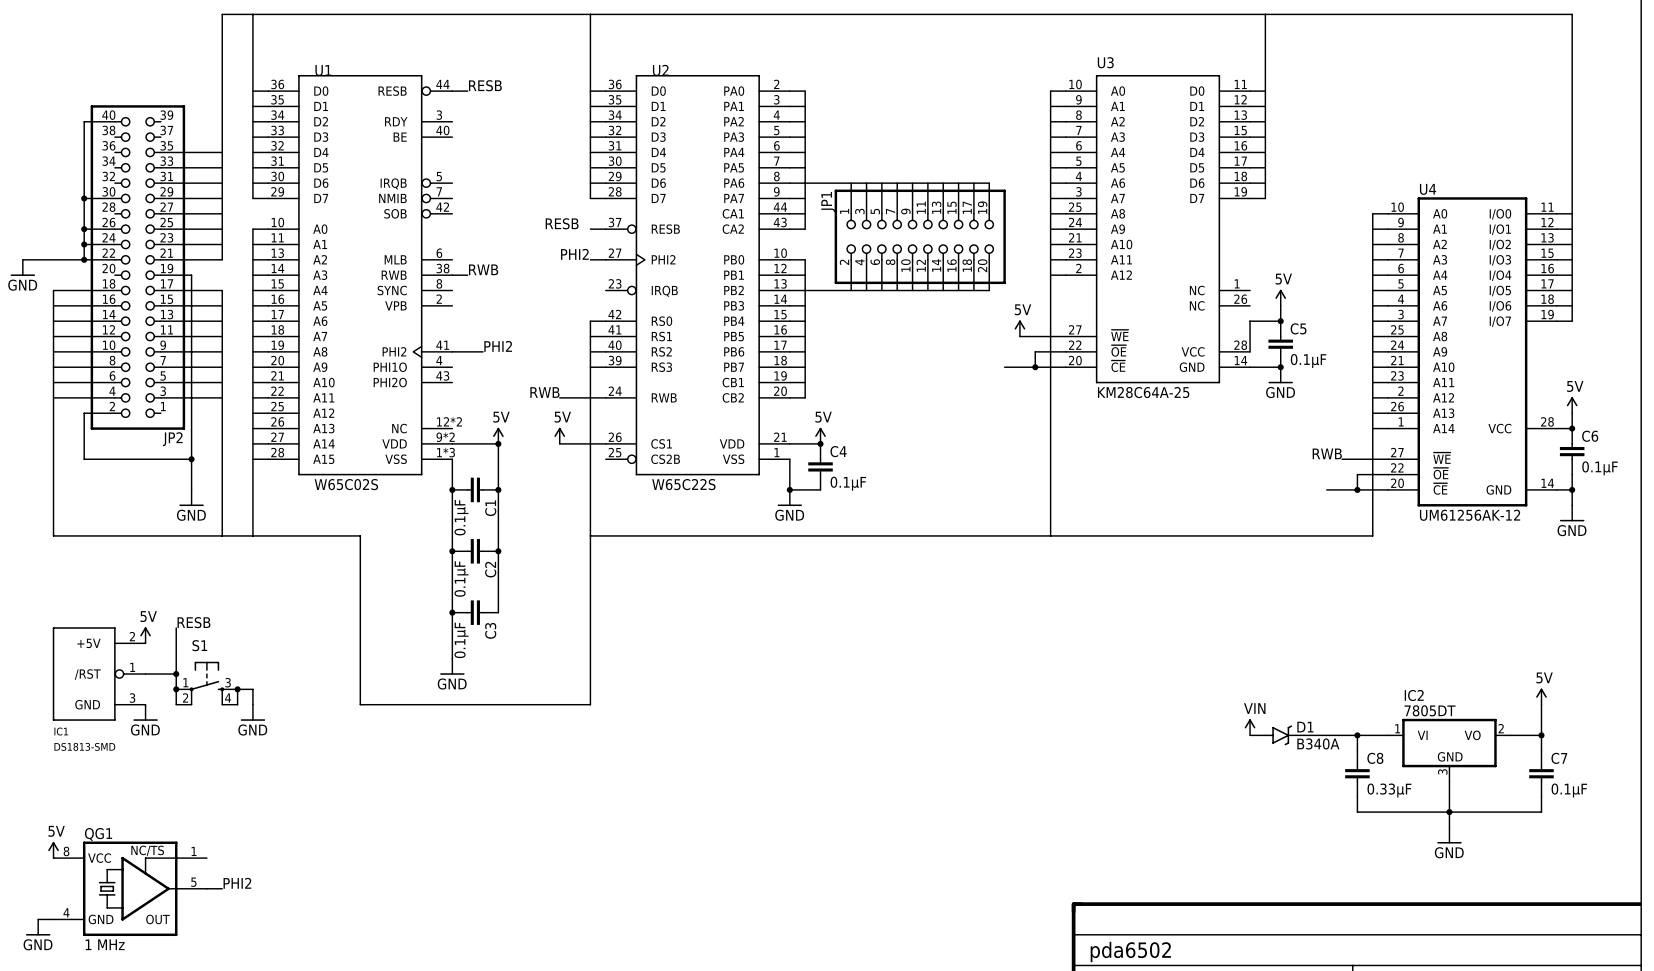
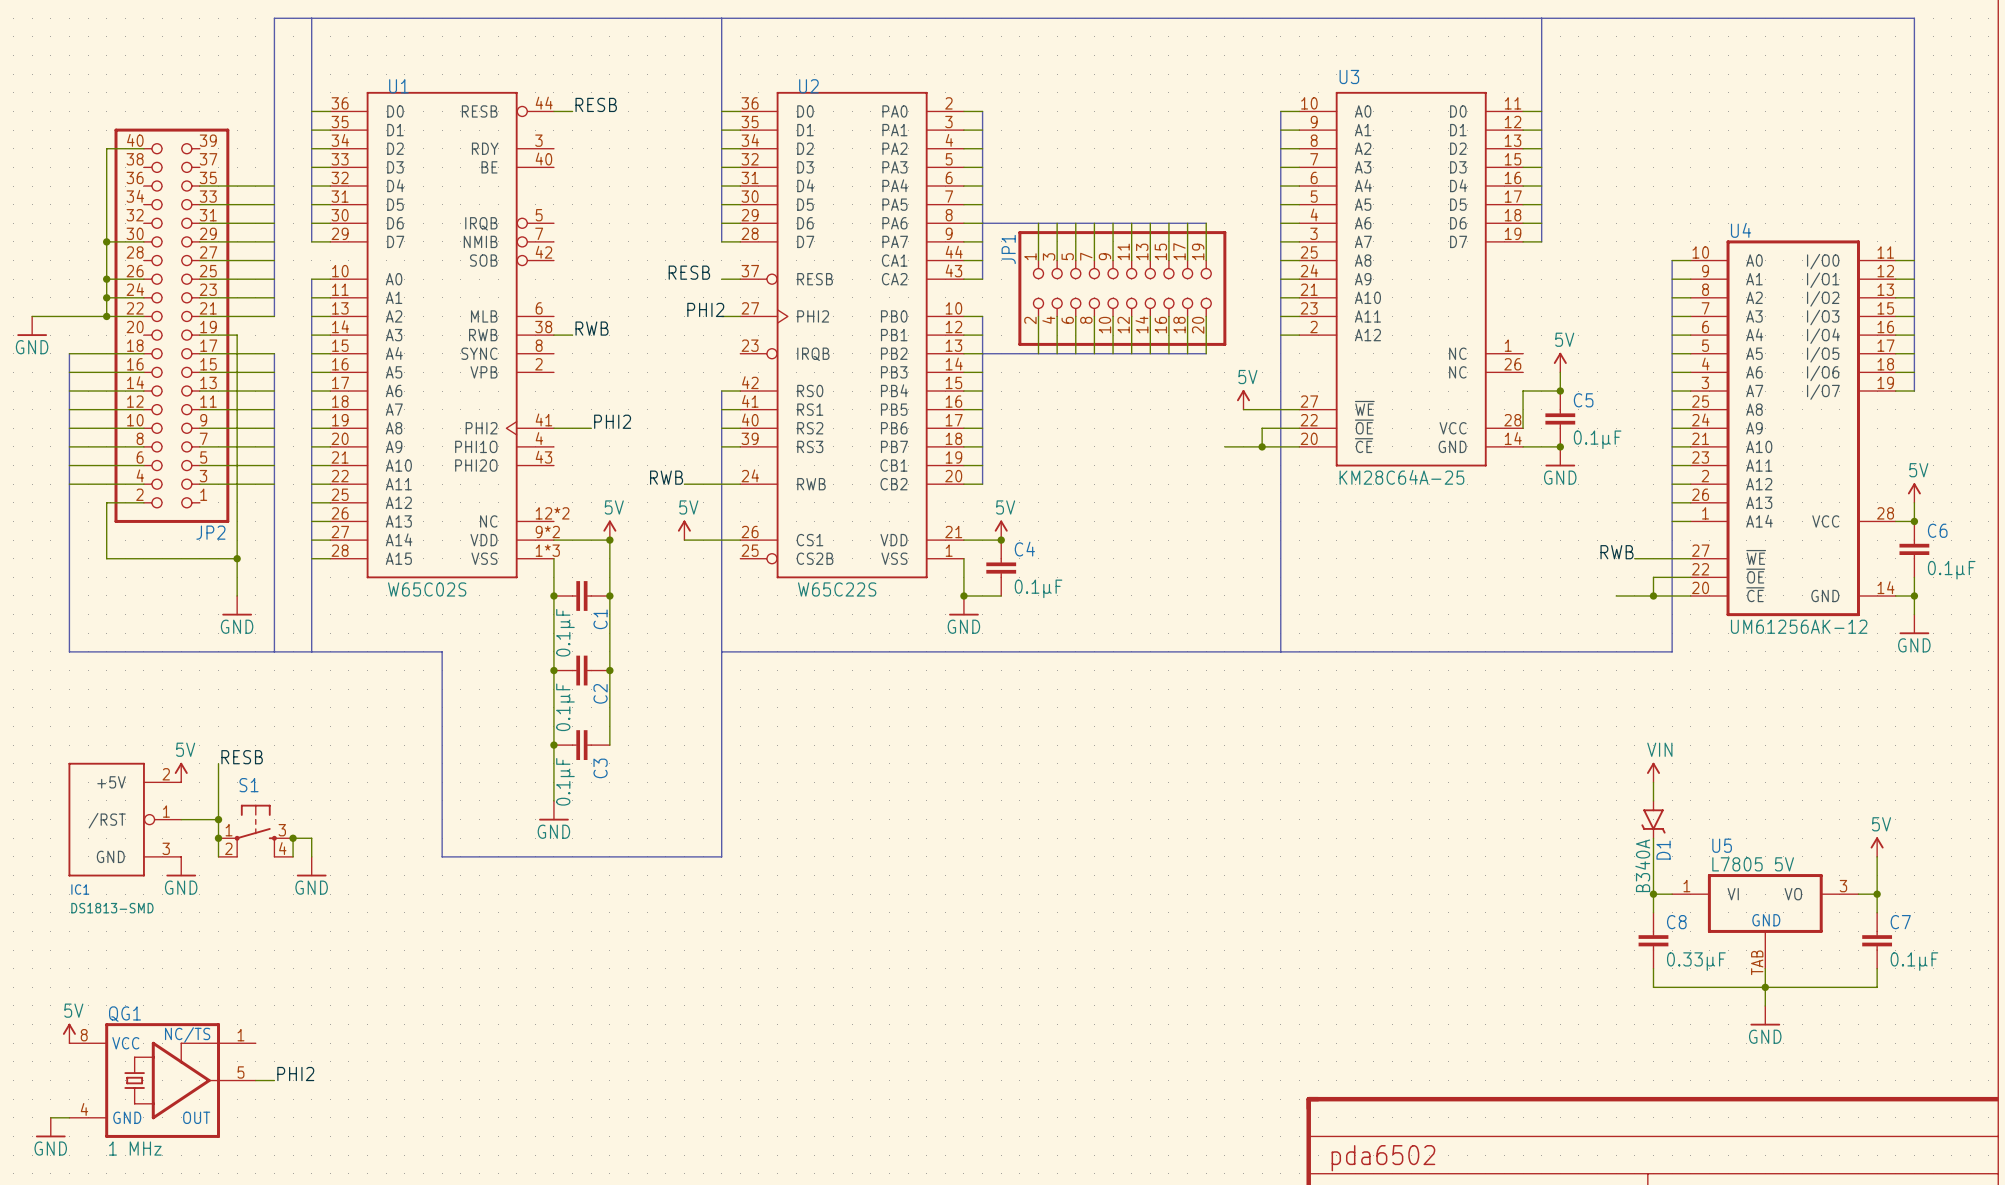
wire: none -> (1653, 782) (1653, 800)
power symbol position: VIN (1250, 727) -> VIN (1653, 772)
wire: (1250, 735) (1265, 735) -> none
D1 rotation: 0° (1280, 735) -> 90° clockwise (1653, 819)
D1 position: (1280, 735) -> (1653, 819)
wire: (1296, 735) (1357, 735) -> (1653, 838) (1653, 894)
IC2: 7805DT (1449, 750) -> none
U5: none -> L7805 5V (1765, 921)

